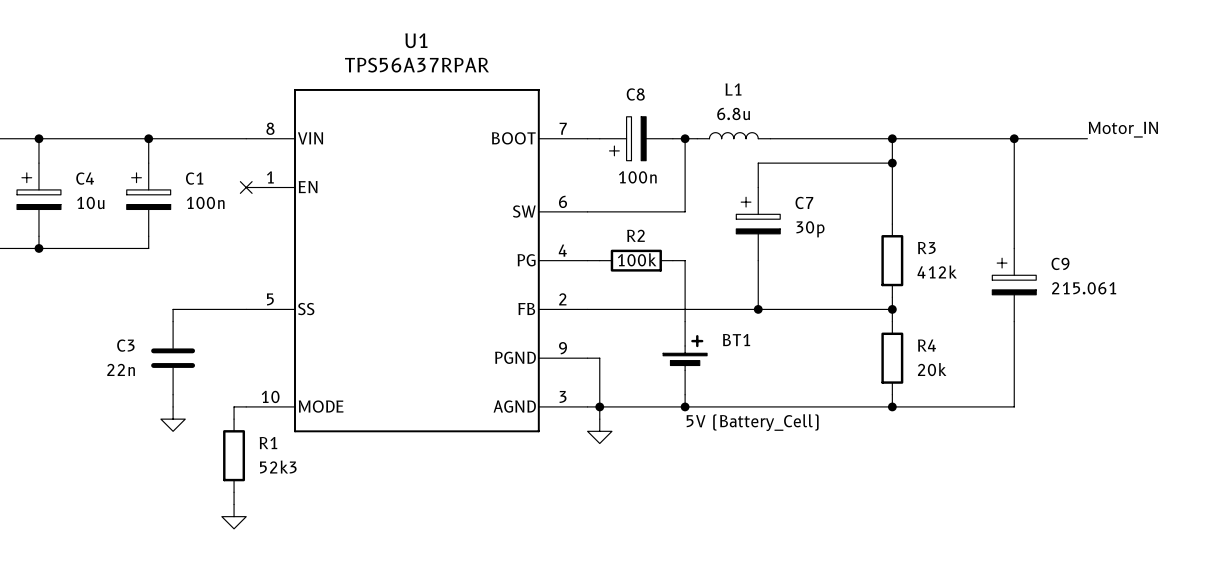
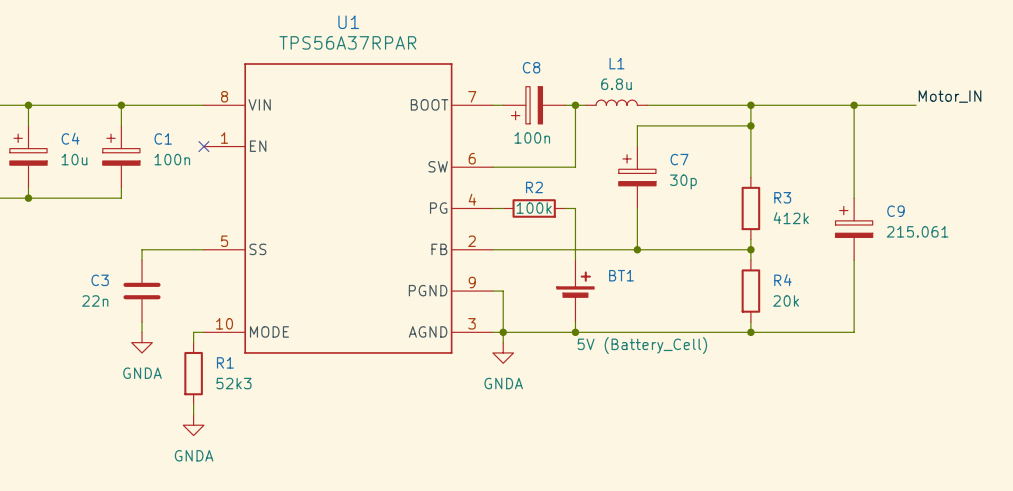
power symbol text: none -> GNDA (142, 373)
power symbol text: none -> GNDA (503, 383)
power symbol text: none -> GNDA (194, 455)

